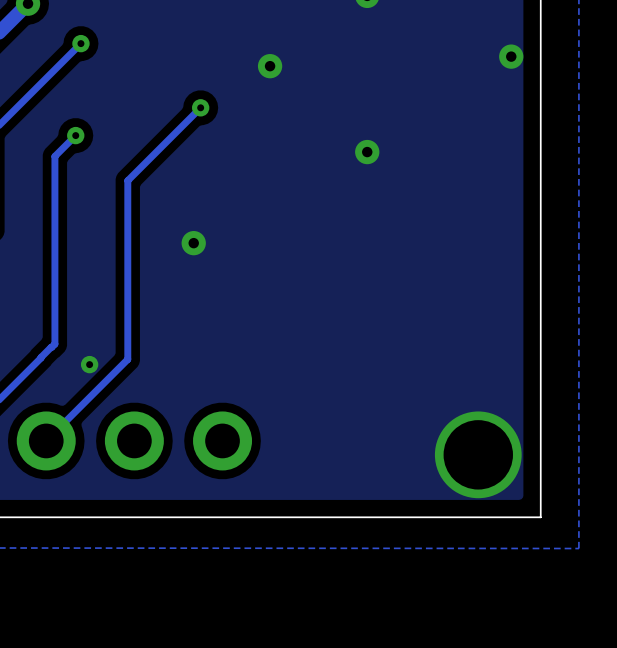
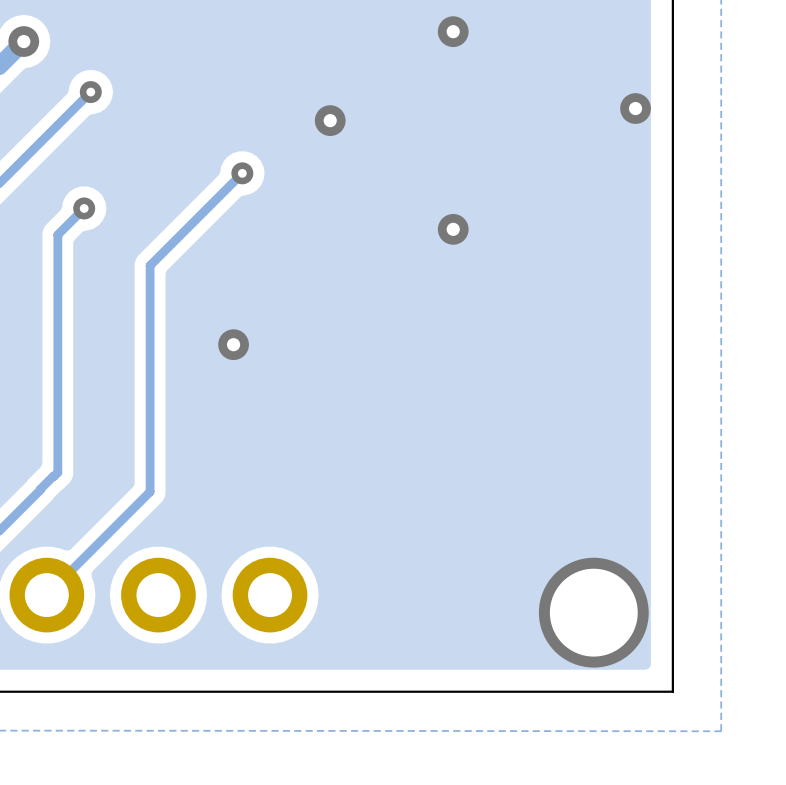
via: (89, 364) -> none

